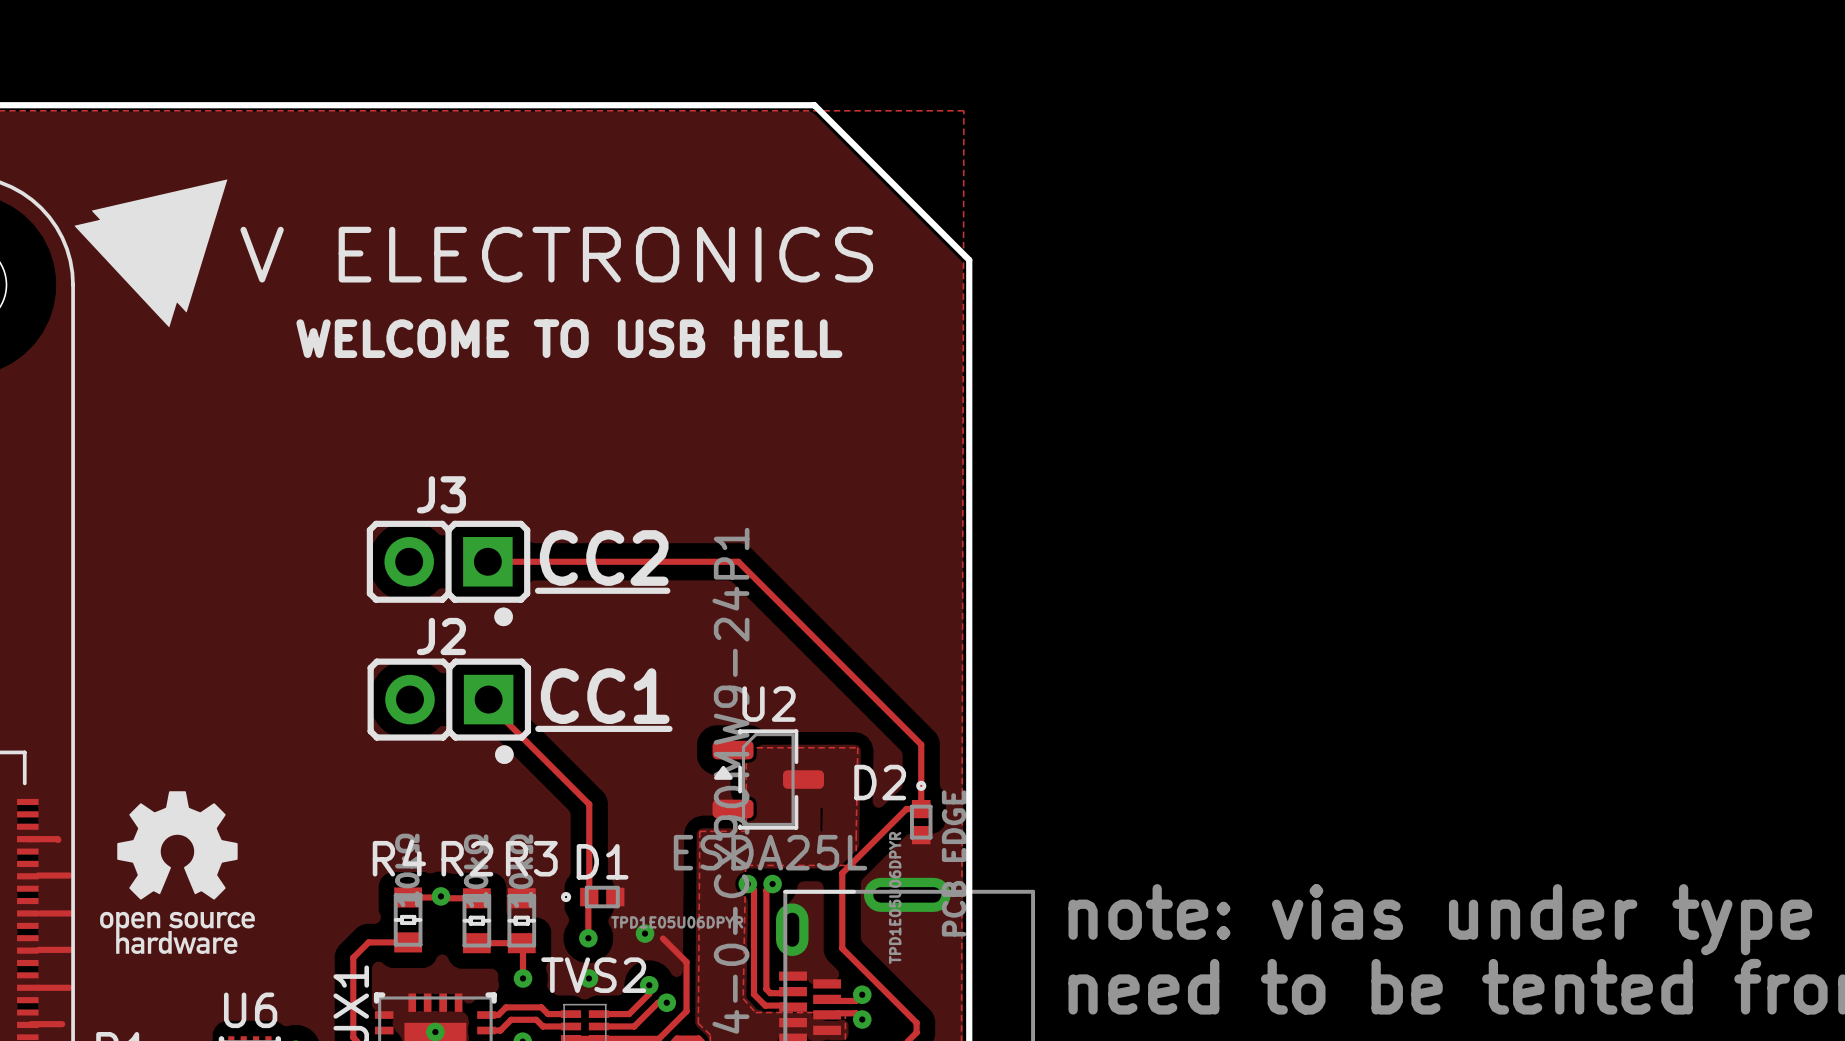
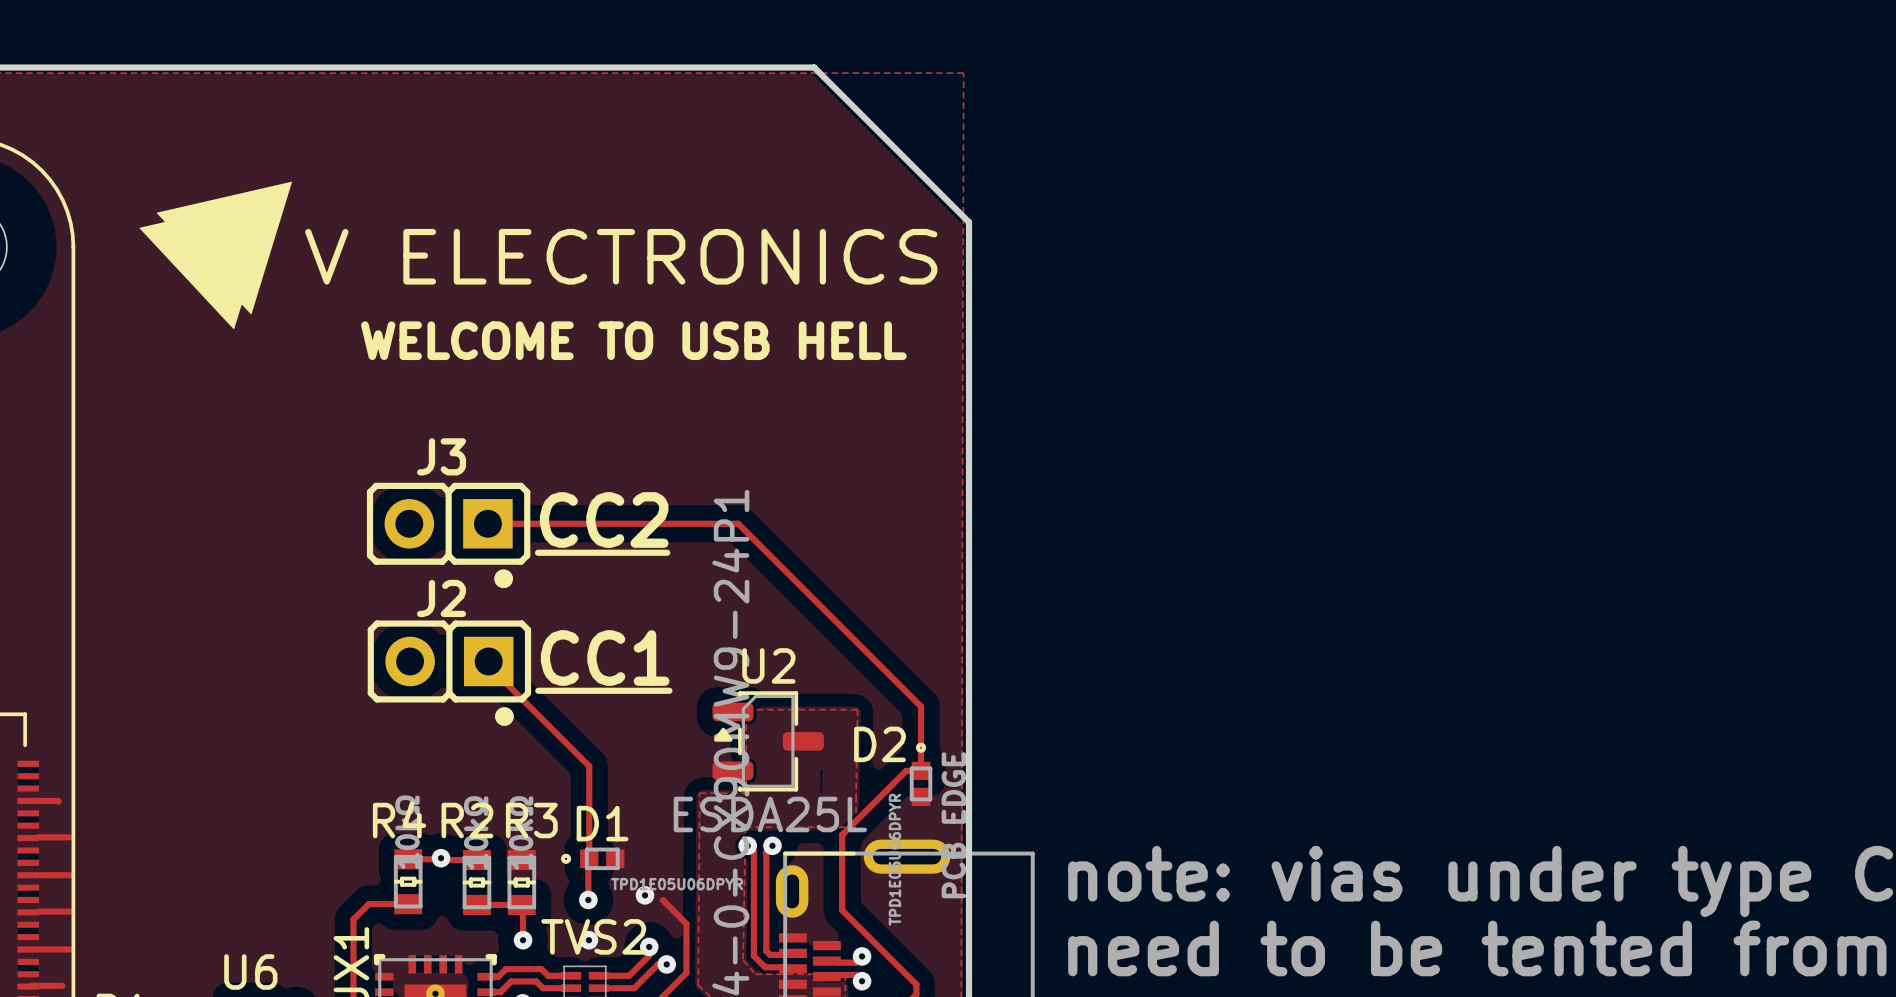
drawing position: (150, 253) -> (215, 255)
text position: V ELECTRONICS (556, 254) -> V ELECTRONICS (621, 256)
text position: WELCOME TO USB HELL (569, 338) -> WELCOME TO USB HELL (633, 340)
drawing: [100, 791, 255, 954] -> none

